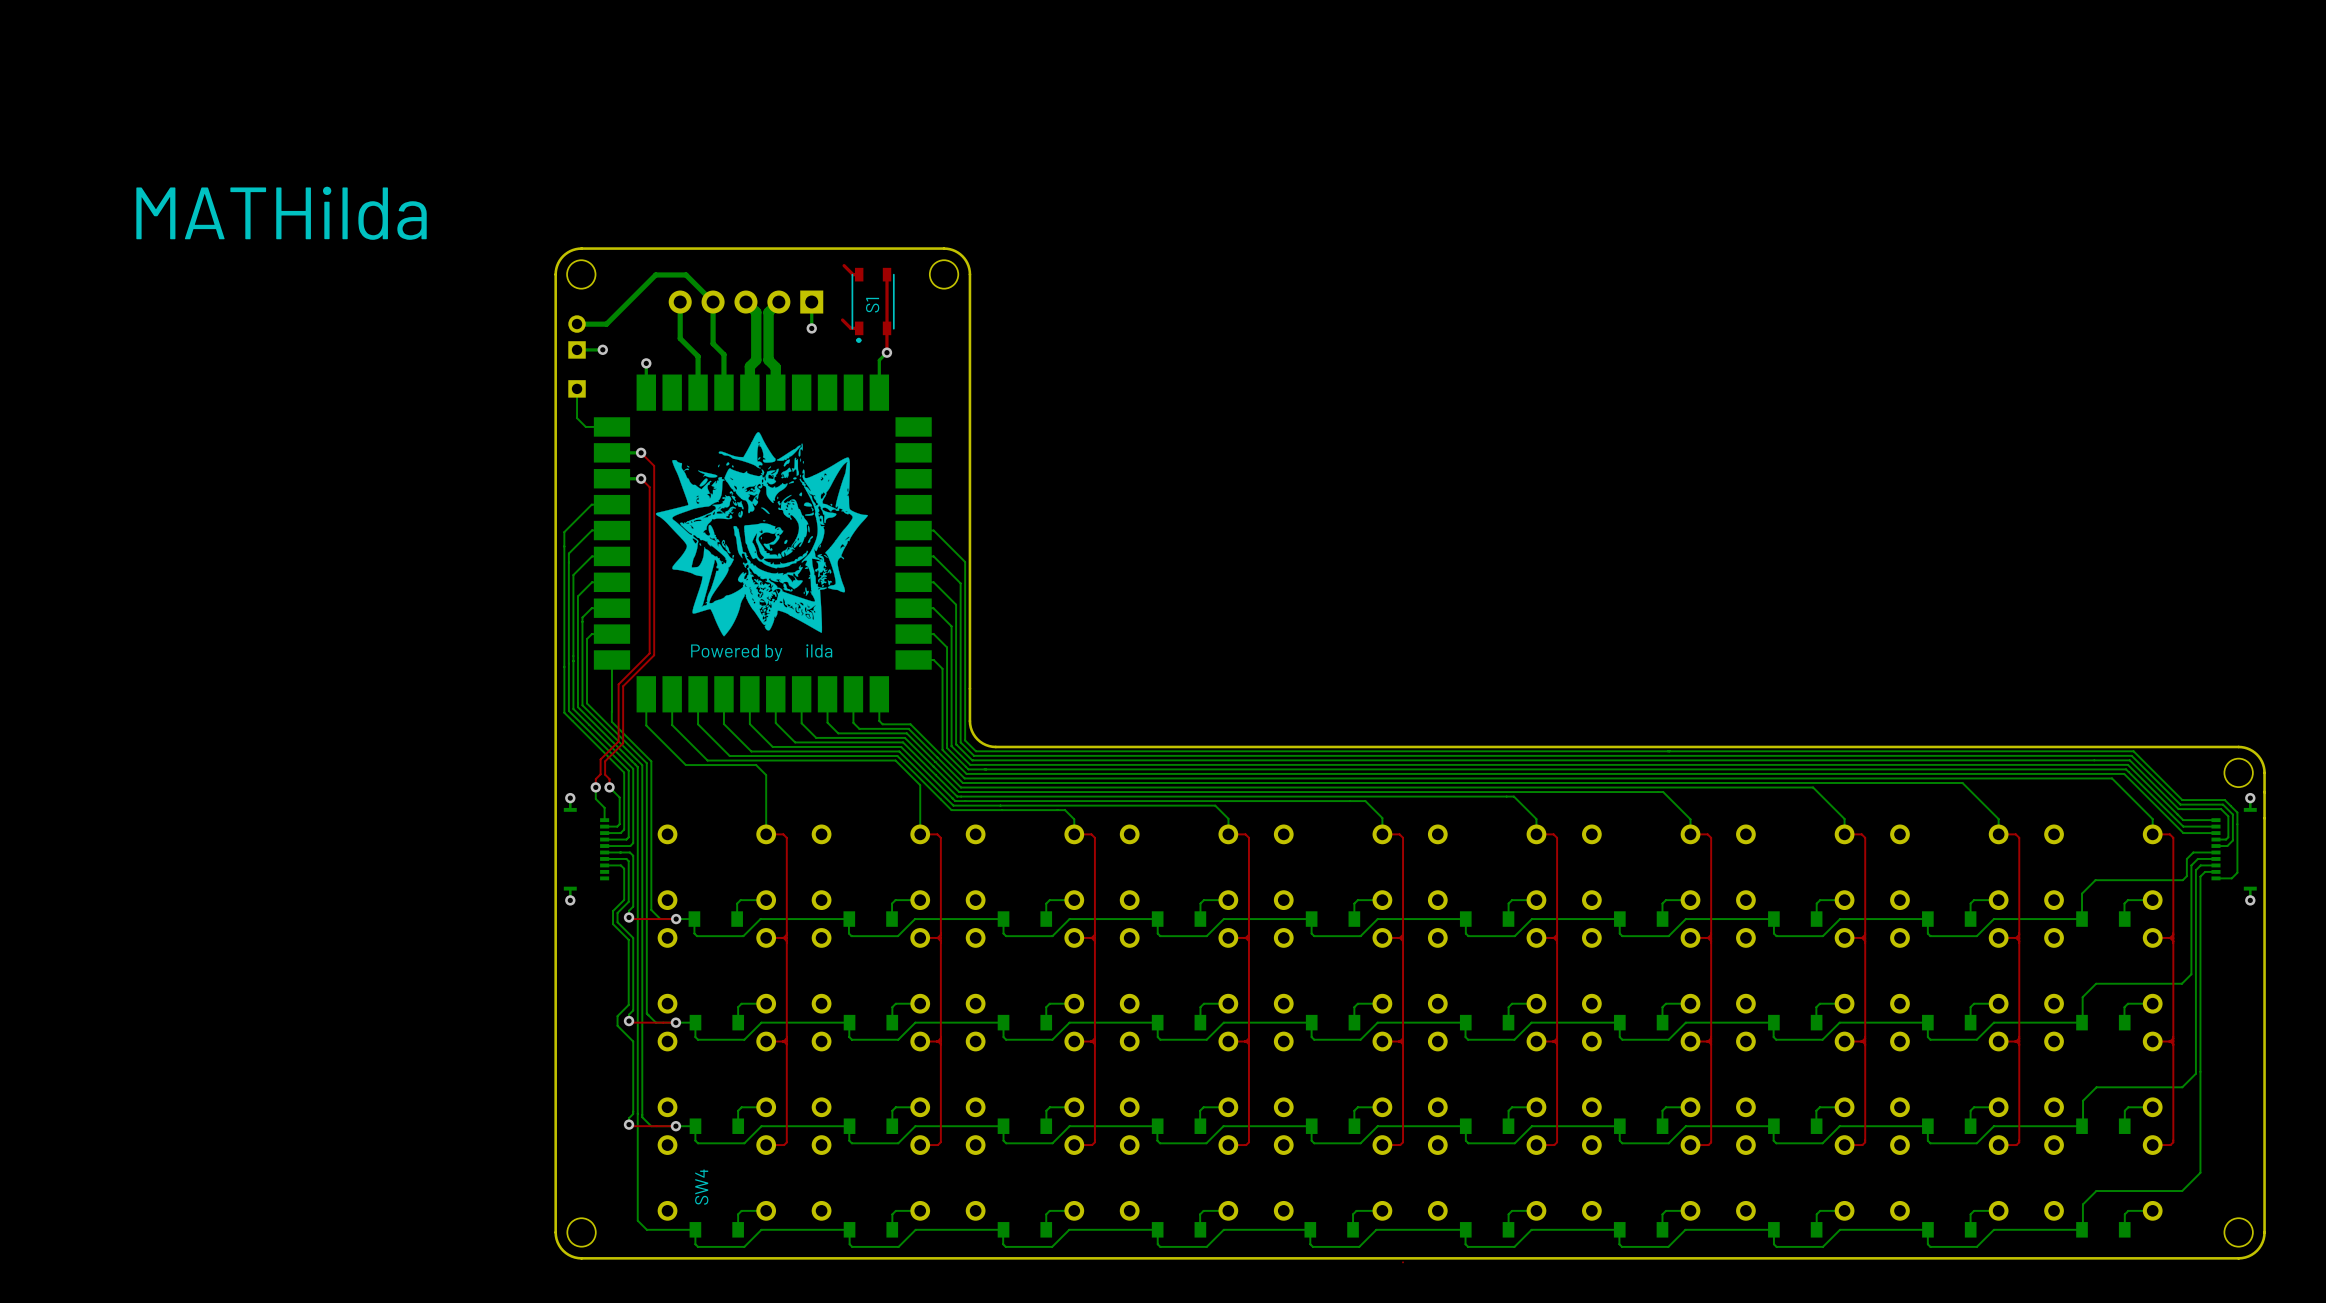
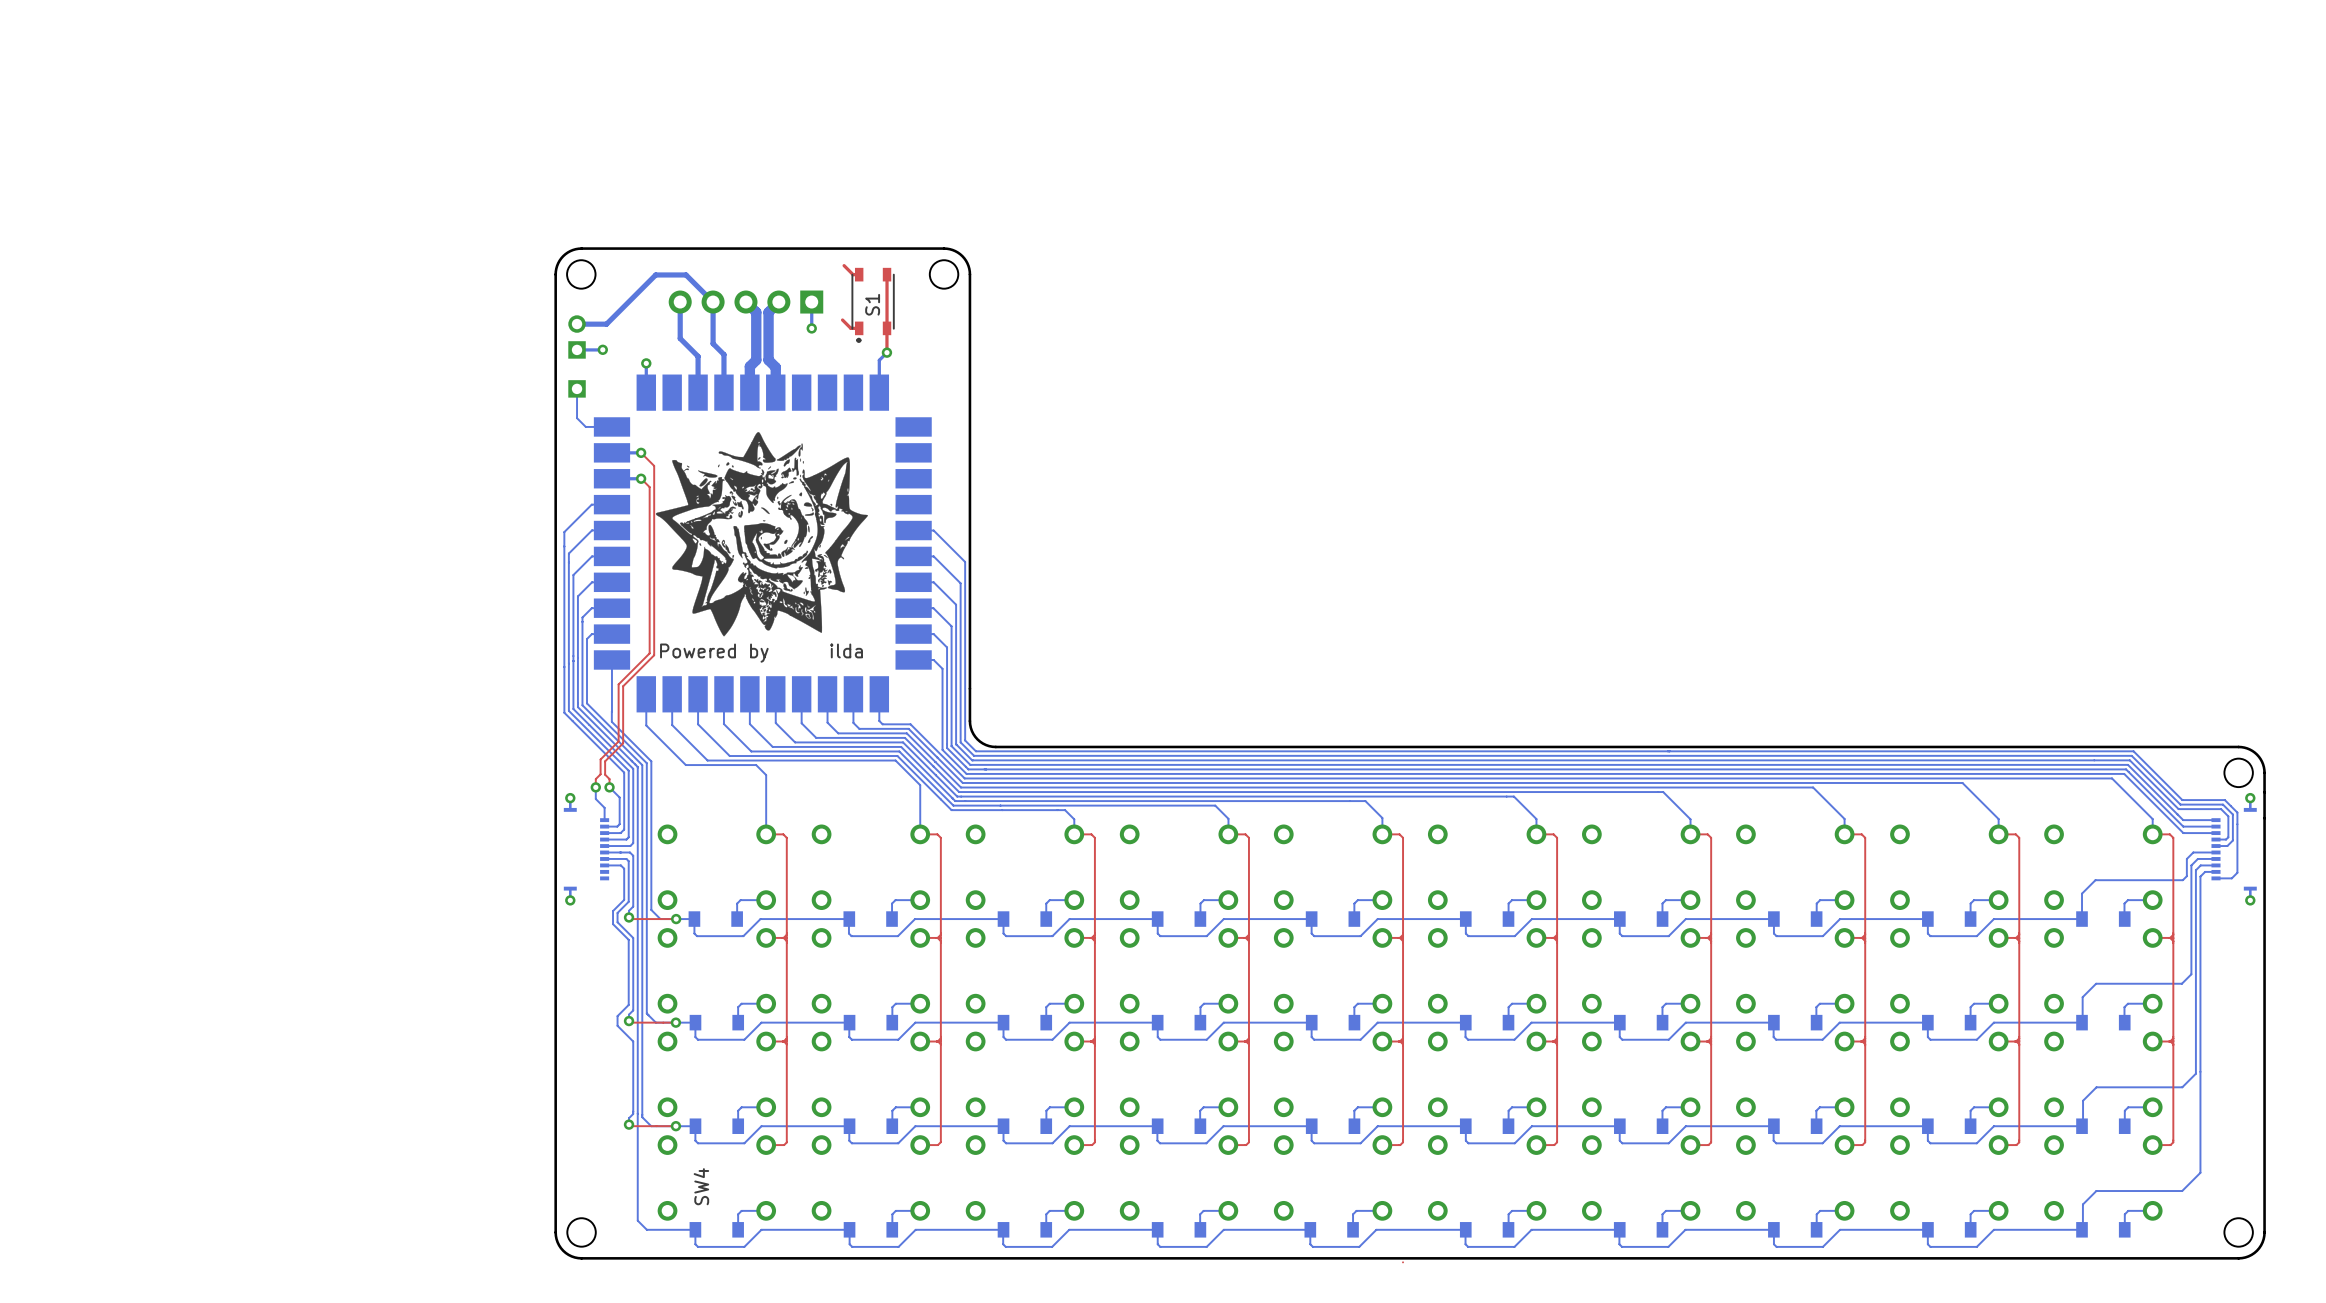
text: MATHilda (281, 213) -> none

